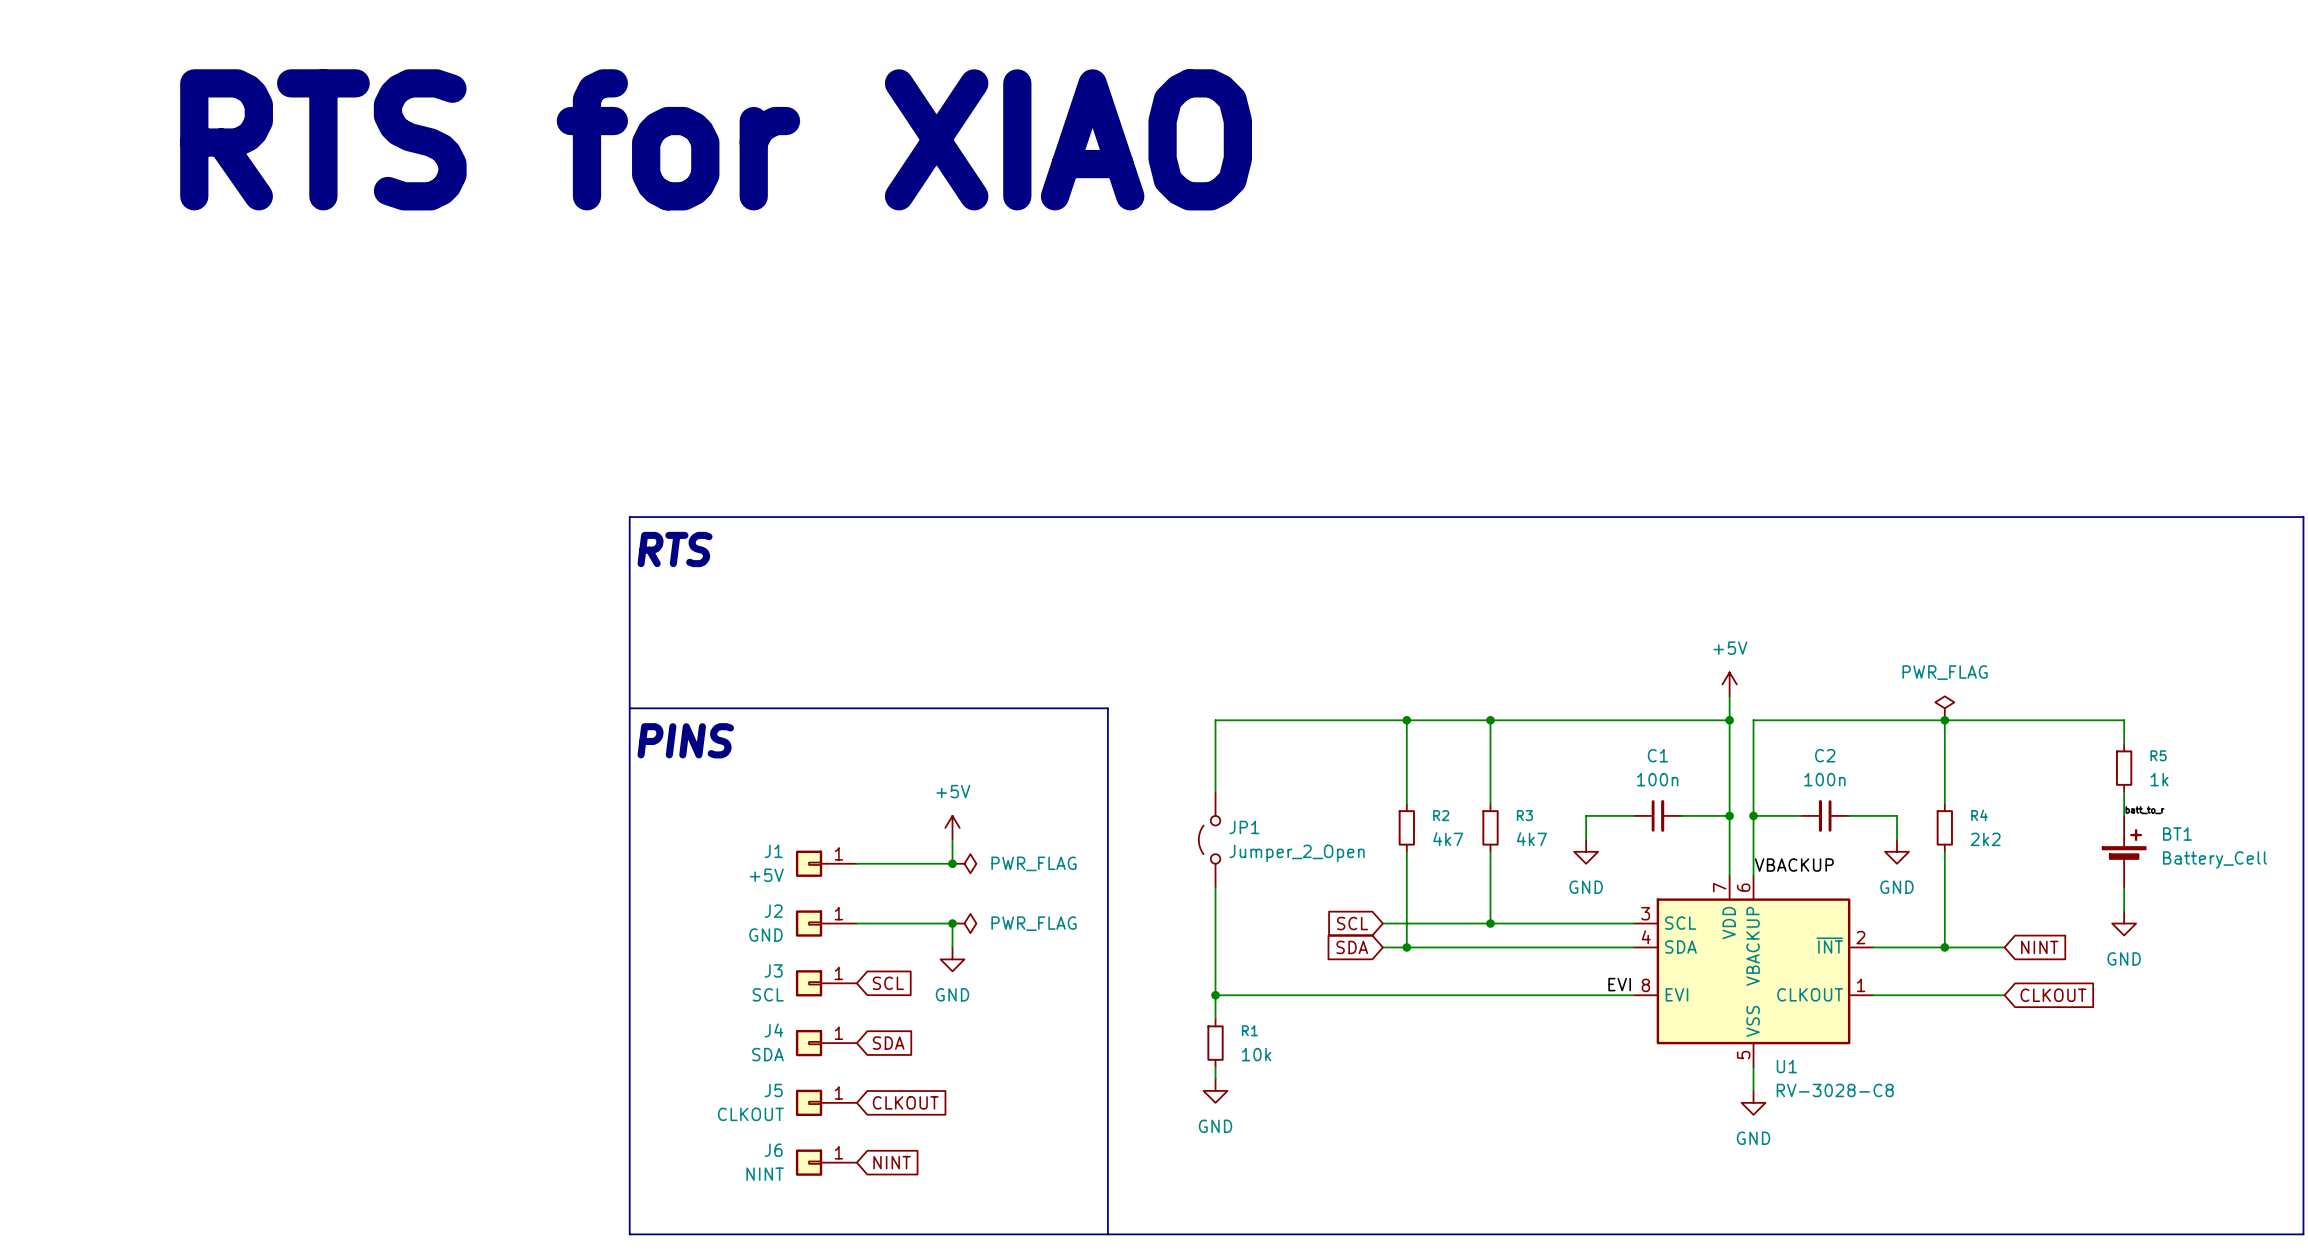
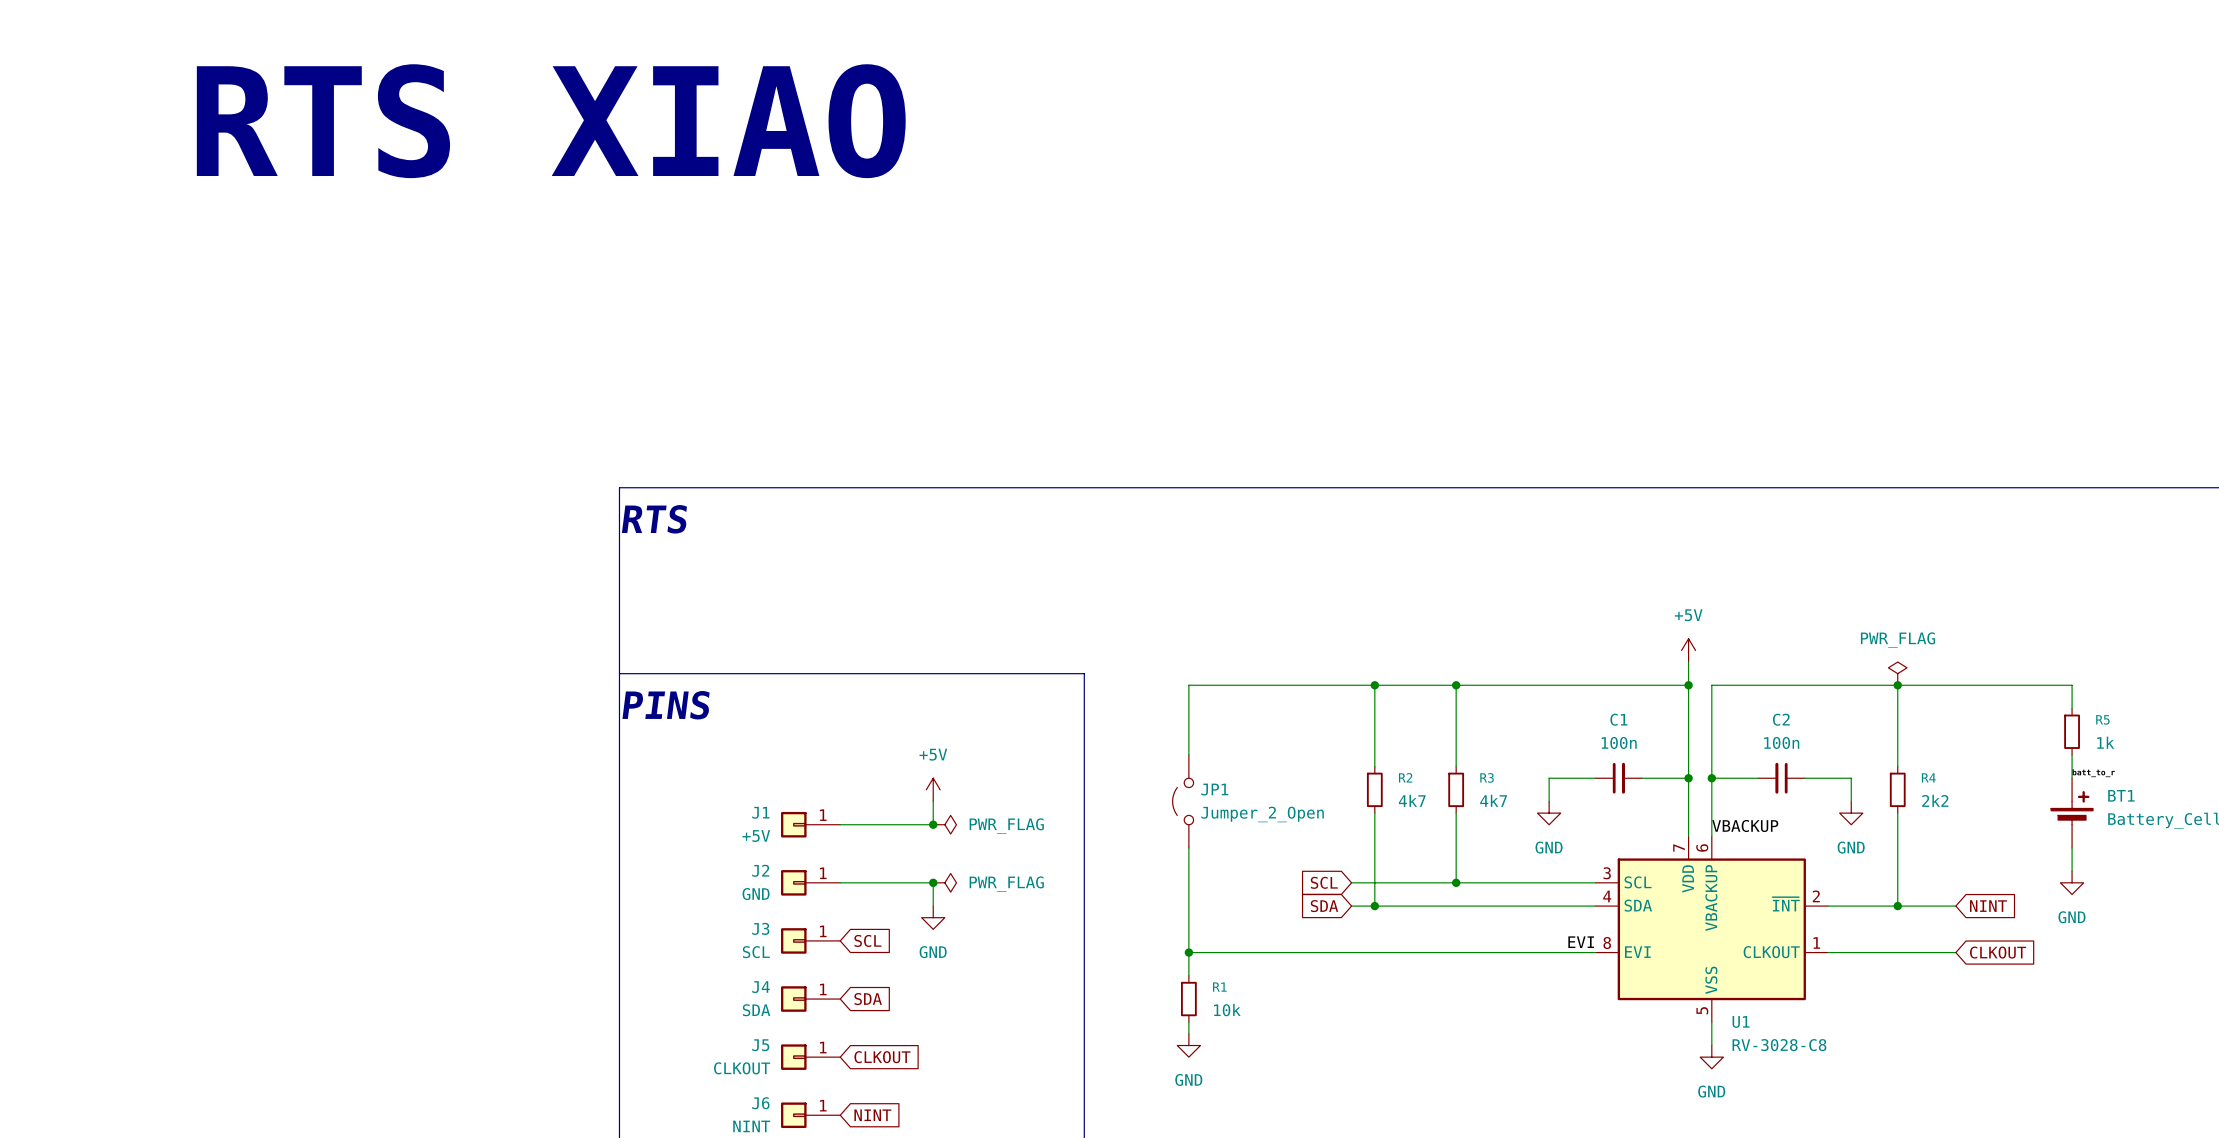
text: RTS for XIAO (716, 139) -> RTS XIAO (551, 121)

